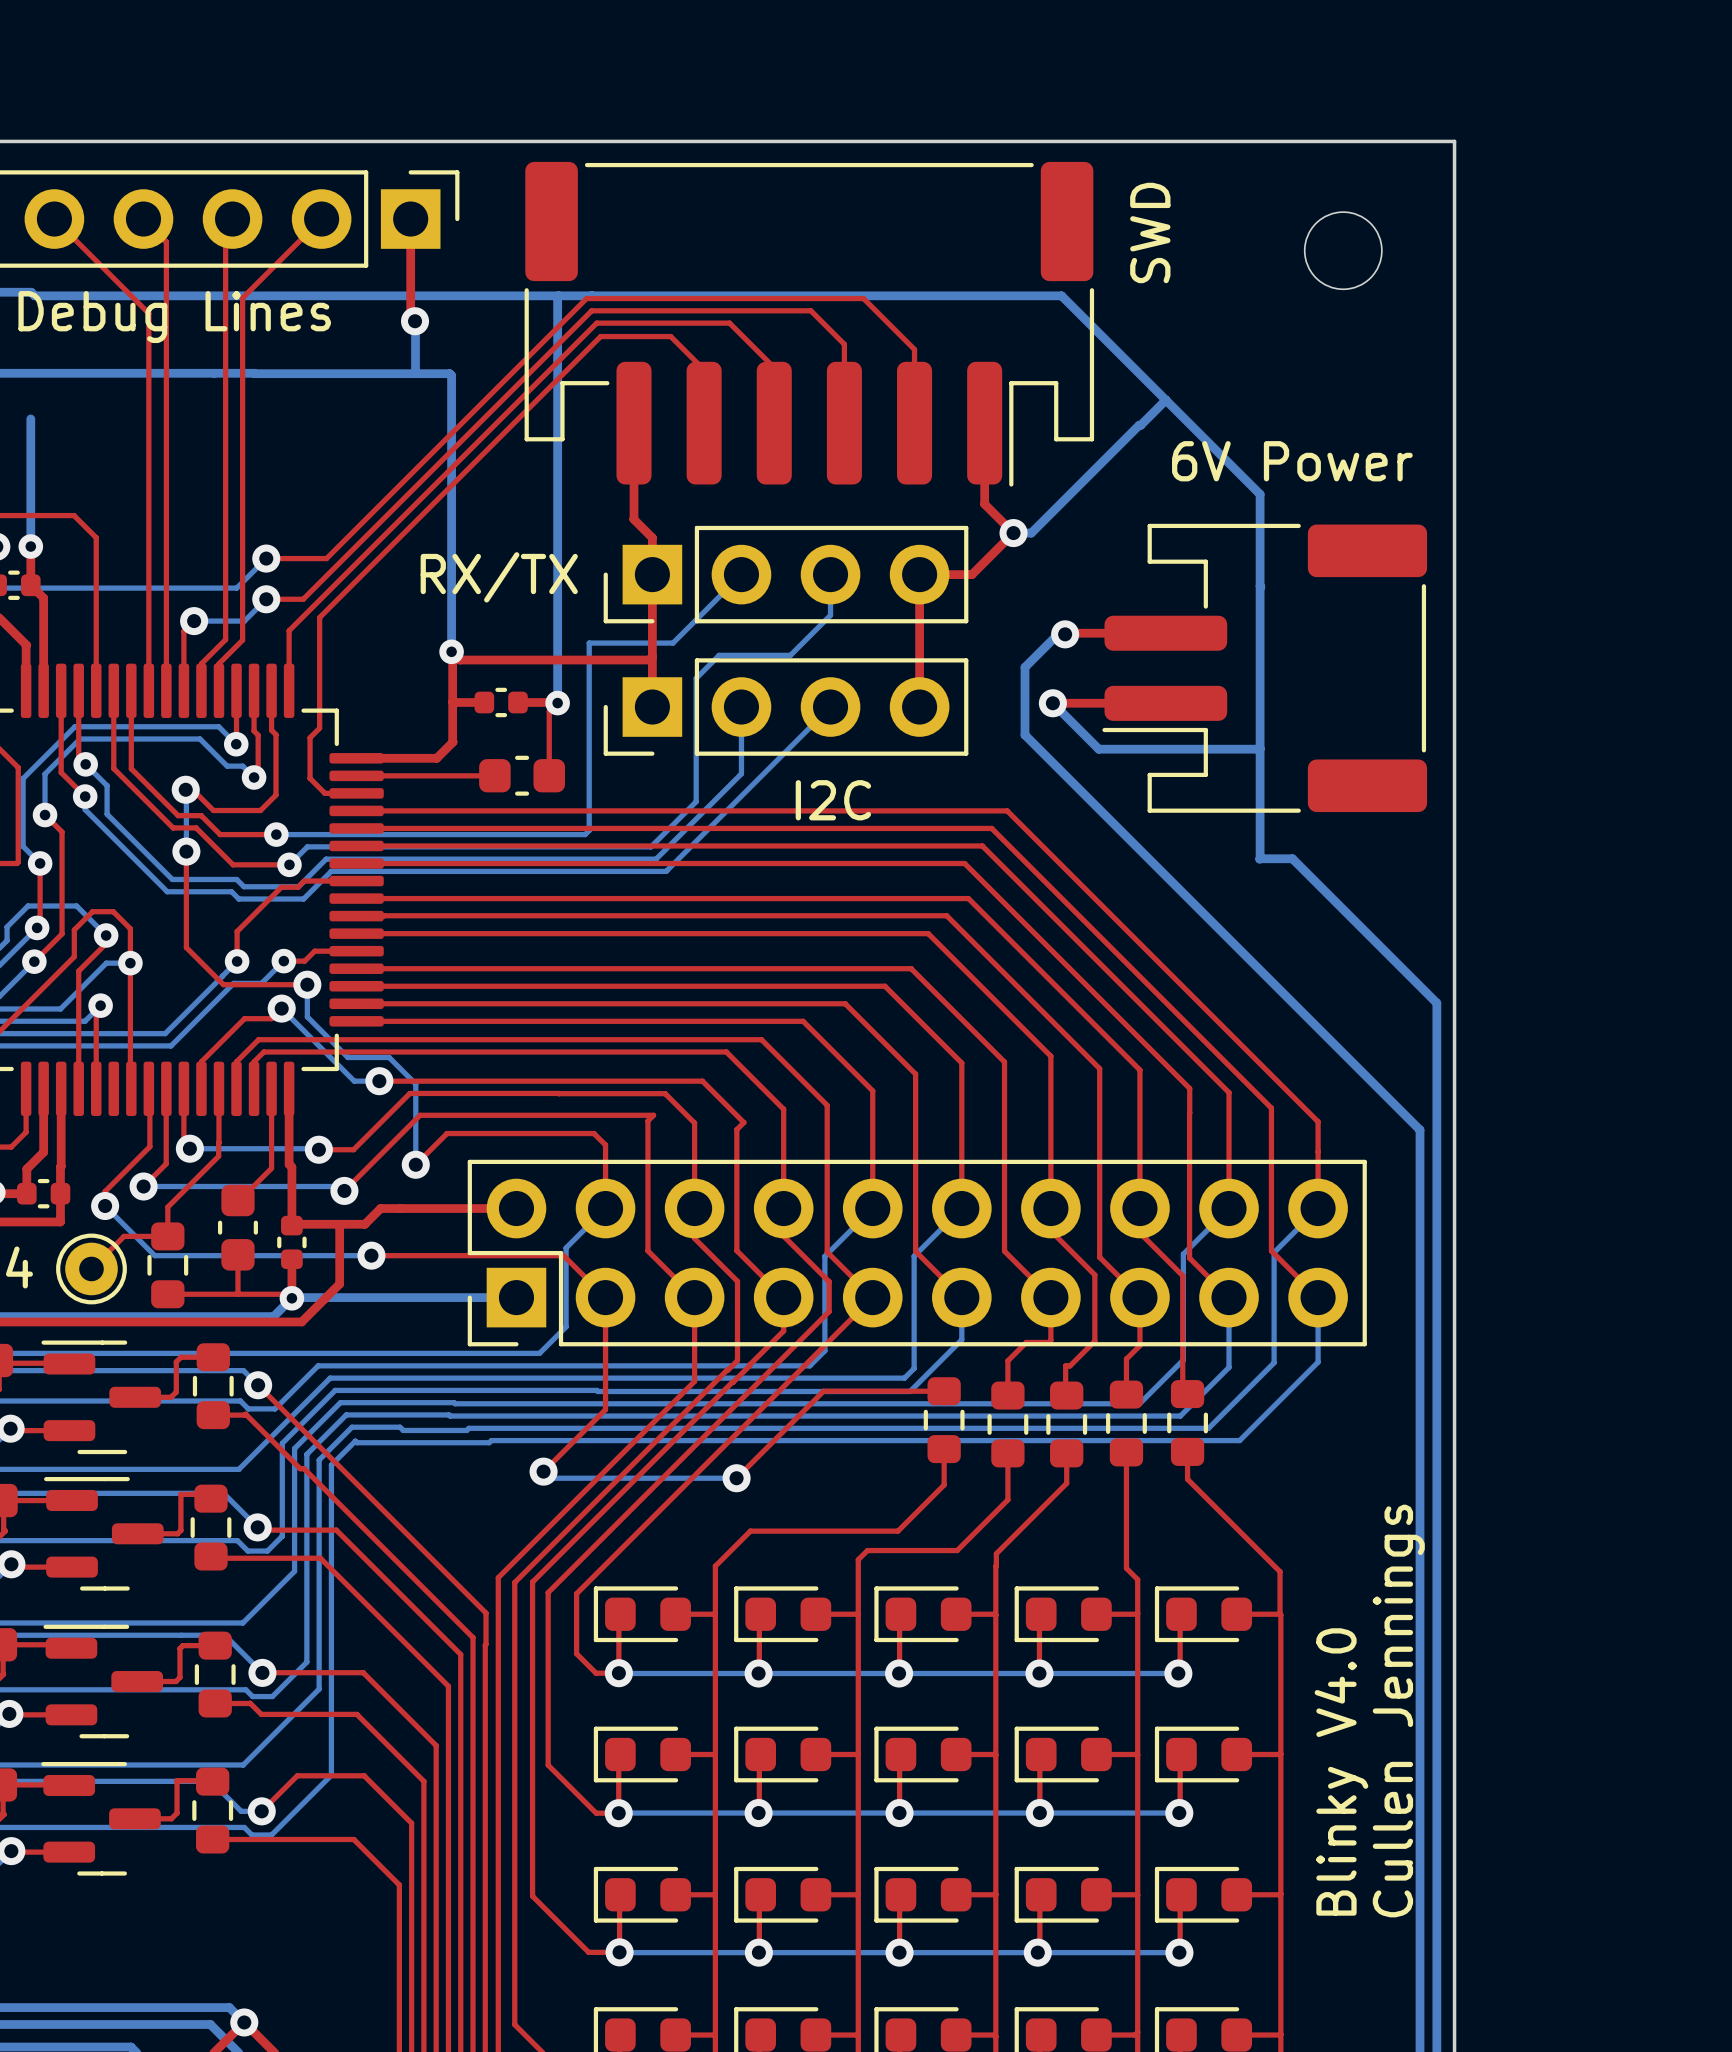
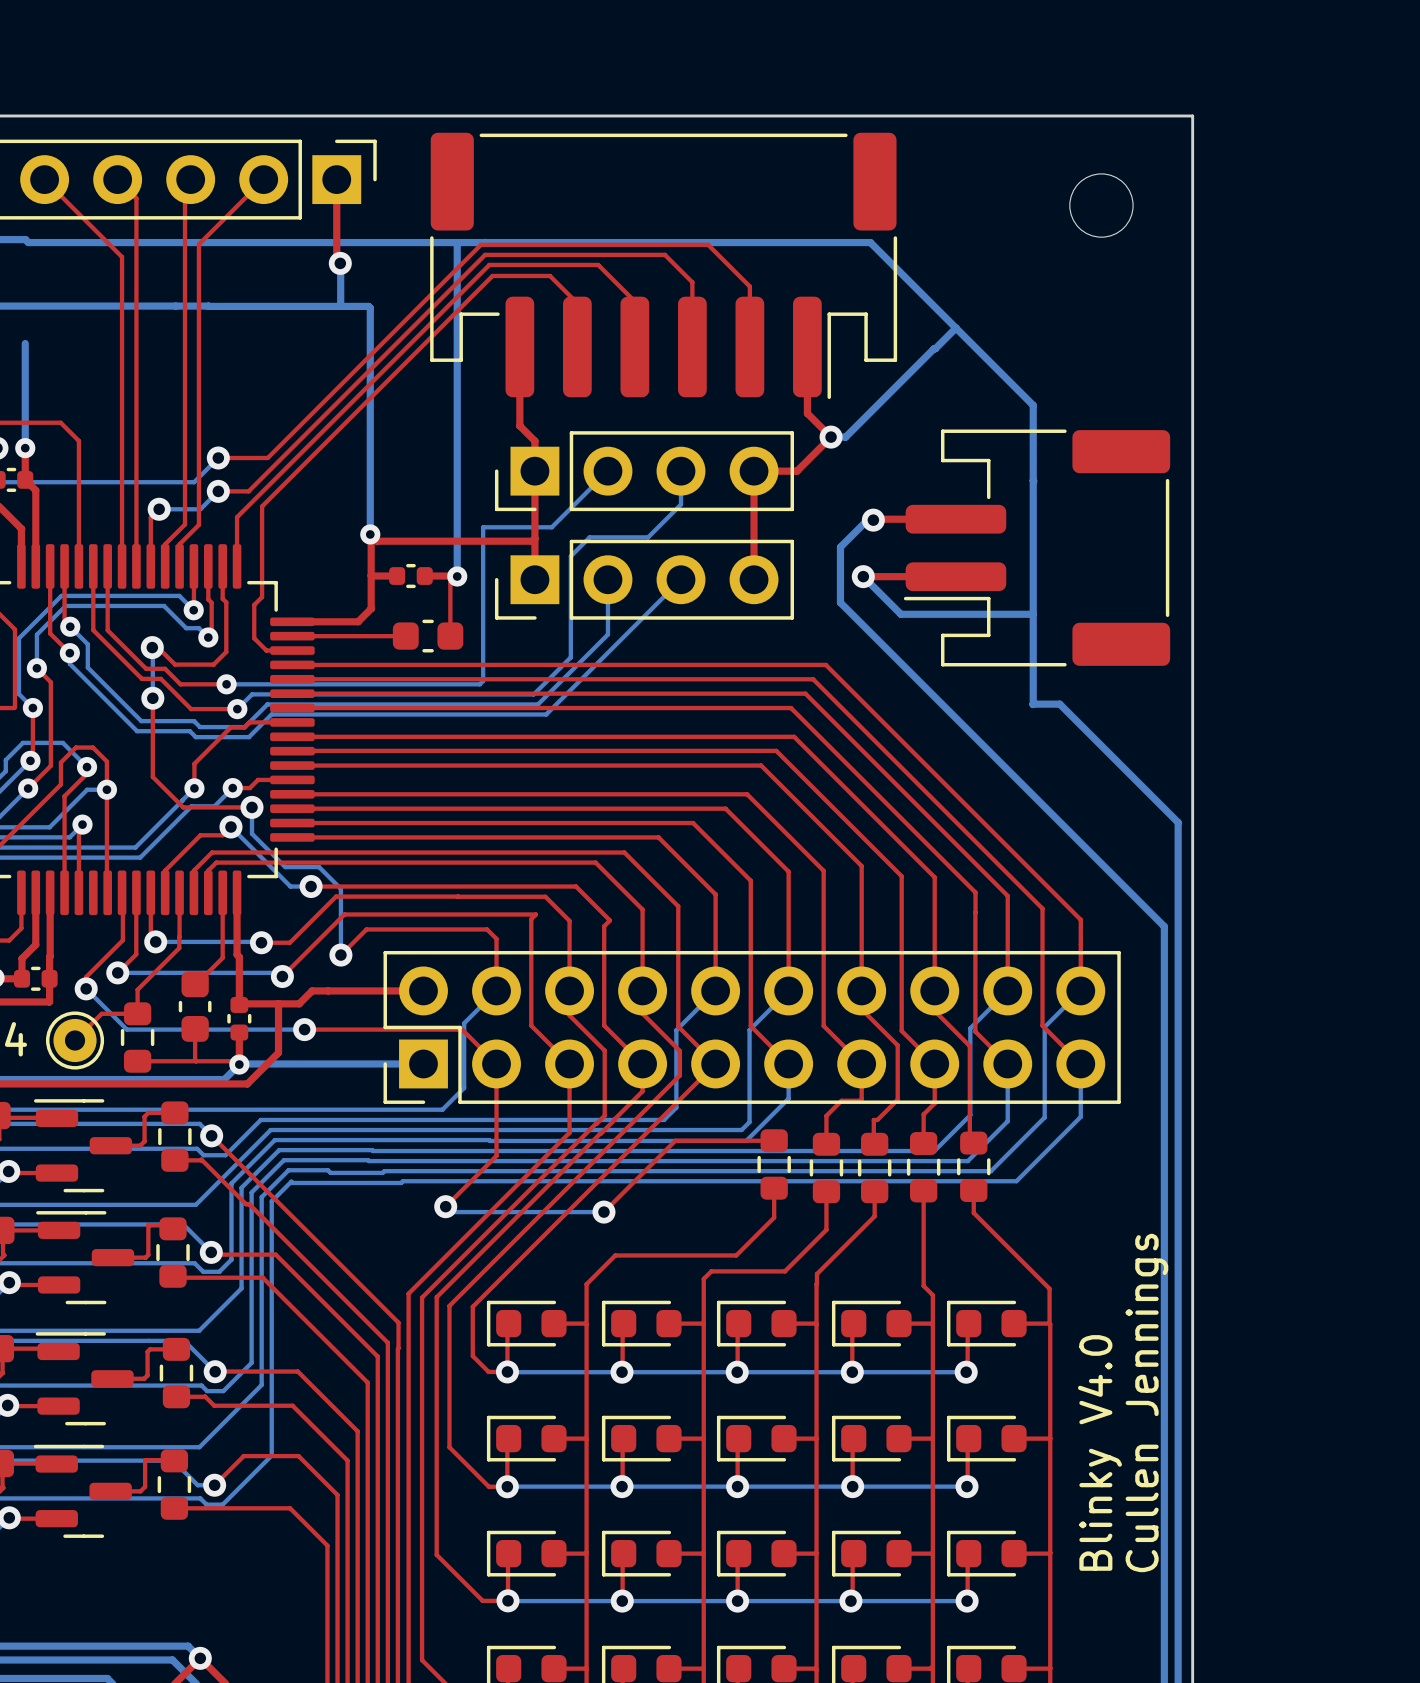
text: SWD (1150, 232) -> none
text: Debug Lines (174, 317) -> none
text: 6V Power (1292, 461) -> none
text: RX/TX (499, 577) -> none
text: I2C (833, 800) -> none

